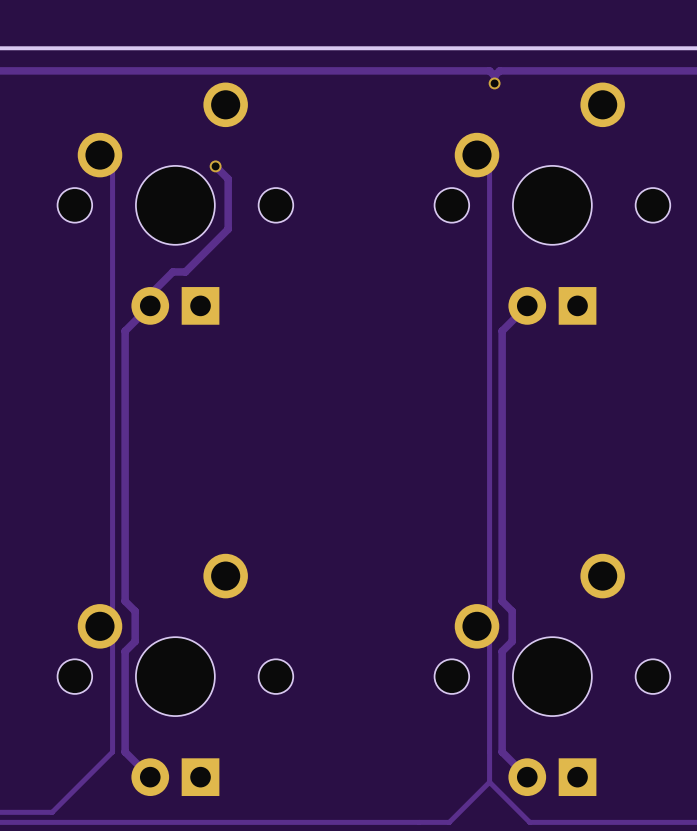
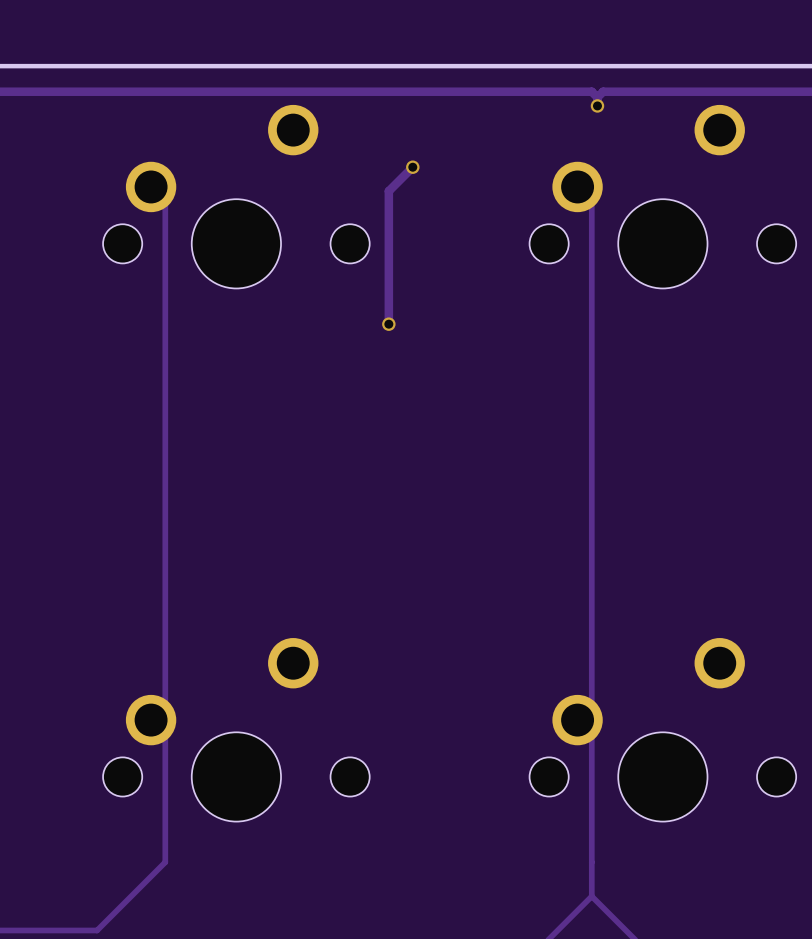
track: none -> (412, 167) (388, 191) (388, 324)
via: none -> (412, 167)
track: (215, 166) (228, 178) (228, 229) (185, 271) (172, 271) (150, 294) (150, 305) (125, 331) (125, 601) (135, 611) (135, 641) (125, 651) (125, 752) (150, 777) -> none
via: (215, 166) -> none
part: (175, 203) -> none
part: (552, 203) -> none
via: none -> (388, 324)
track: (527, 305) (502, 331) (502, 601) (512, 611) (512, 641) (502, 651) (502, 752) (527, 777) -> none
part: (175, 674) -> none
part: (552, 674) -> none

